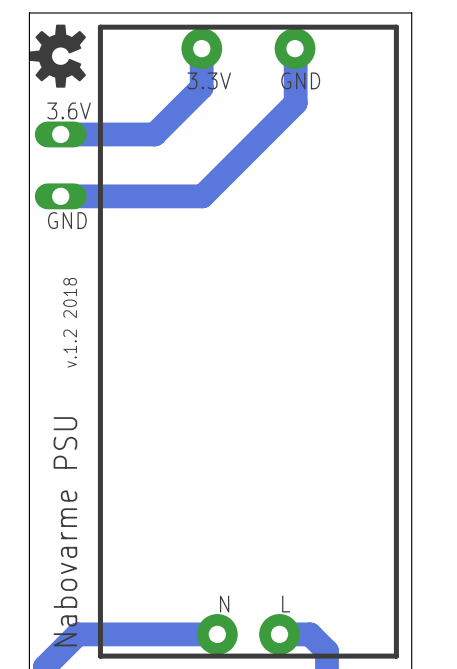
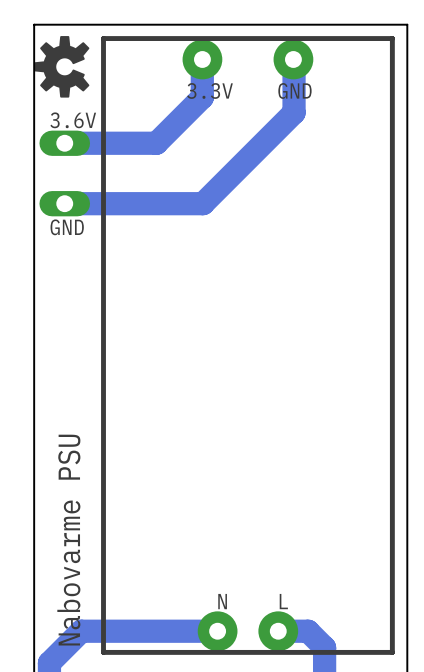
text: v.1.2 2018 (70, 322) -> none

